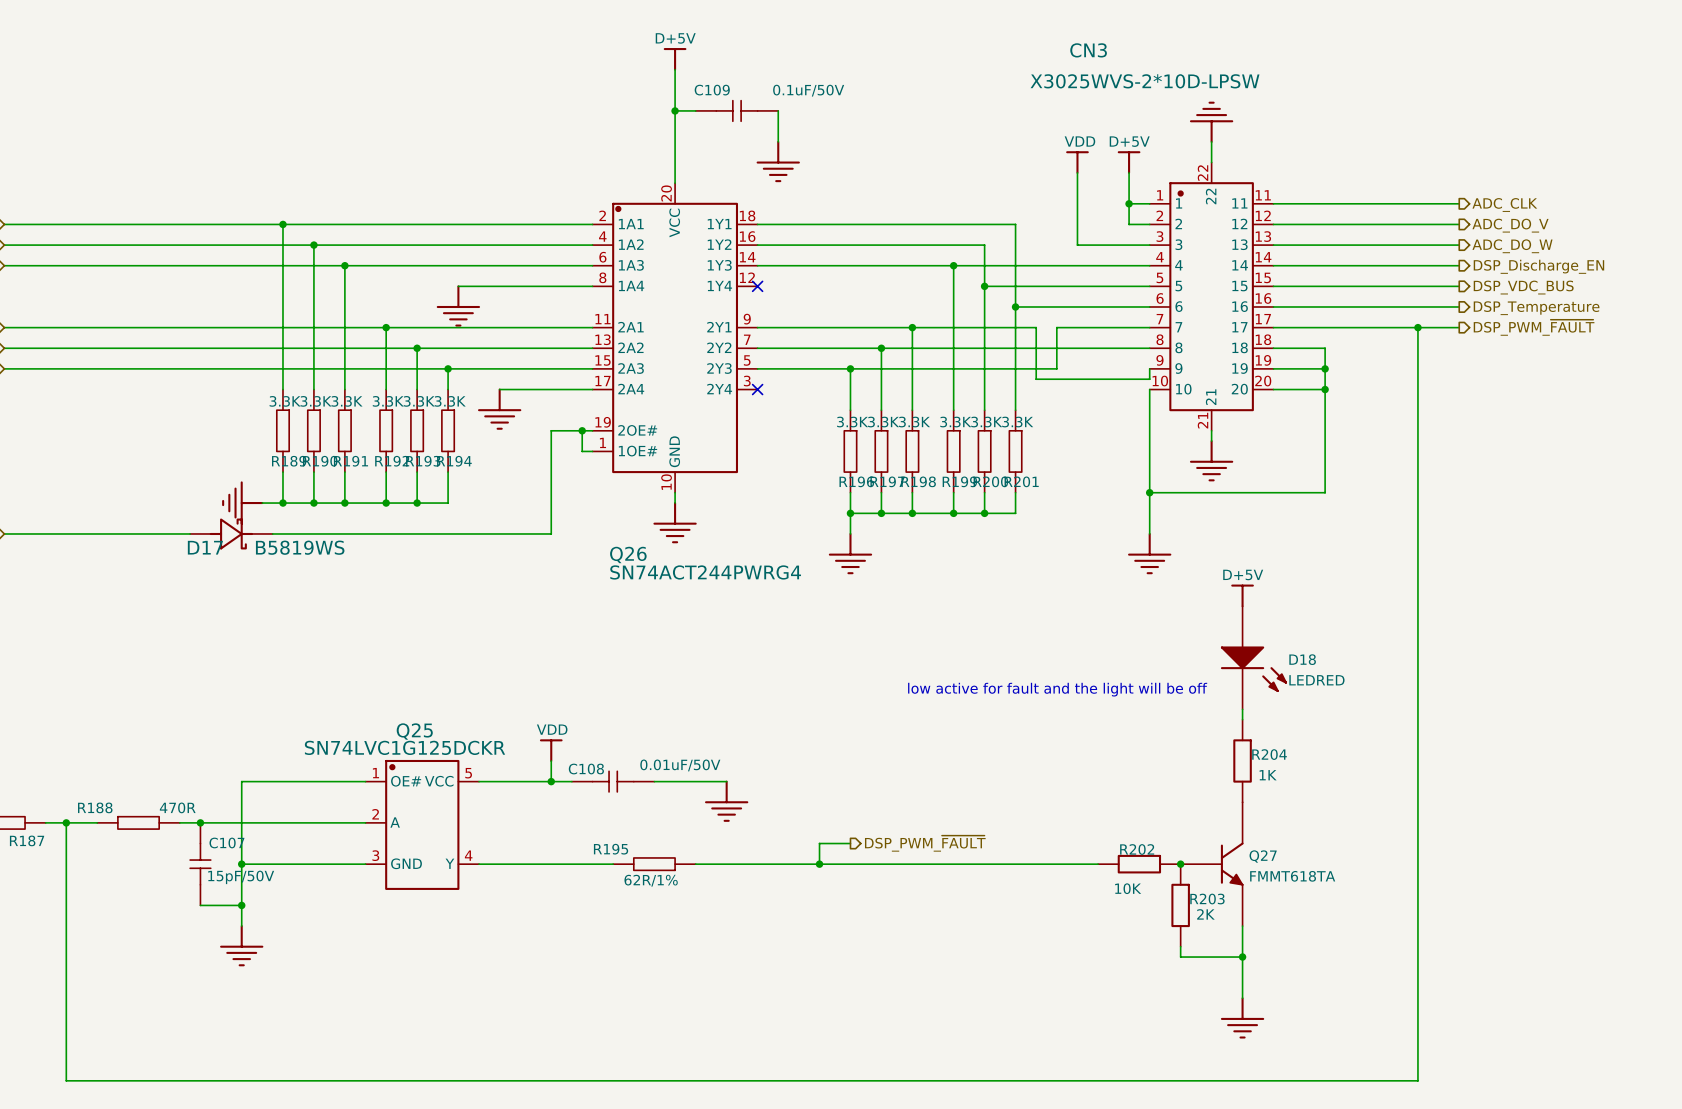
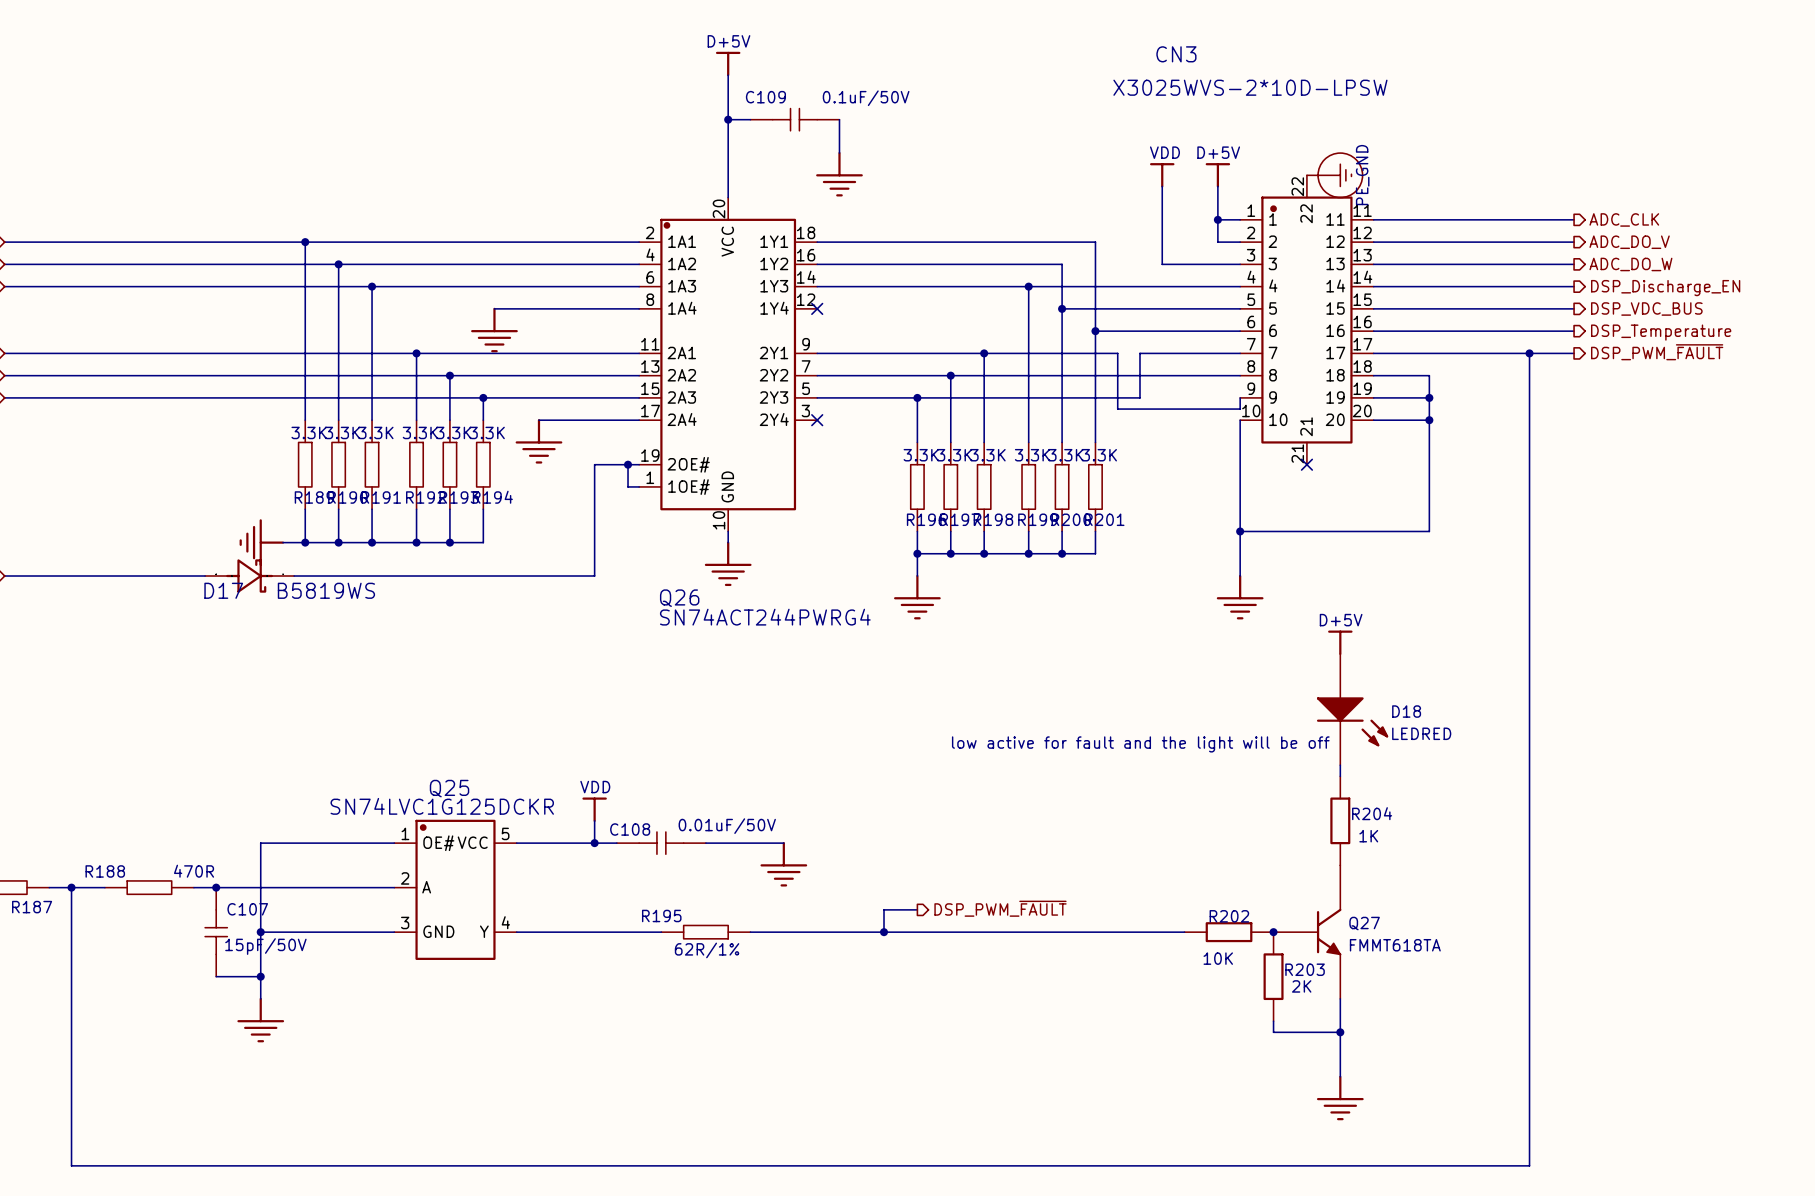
power symbol: (1211, 122) -> none
wire: (1211, 141) (1211, 162) -> none
power symbol: none -> PE_GND (1334, 175)
wire: (1211, 430) (1211, 441) -> none
no-connect mark: none -> (1306, 464)
power symbol: (1211, 460) -> none

